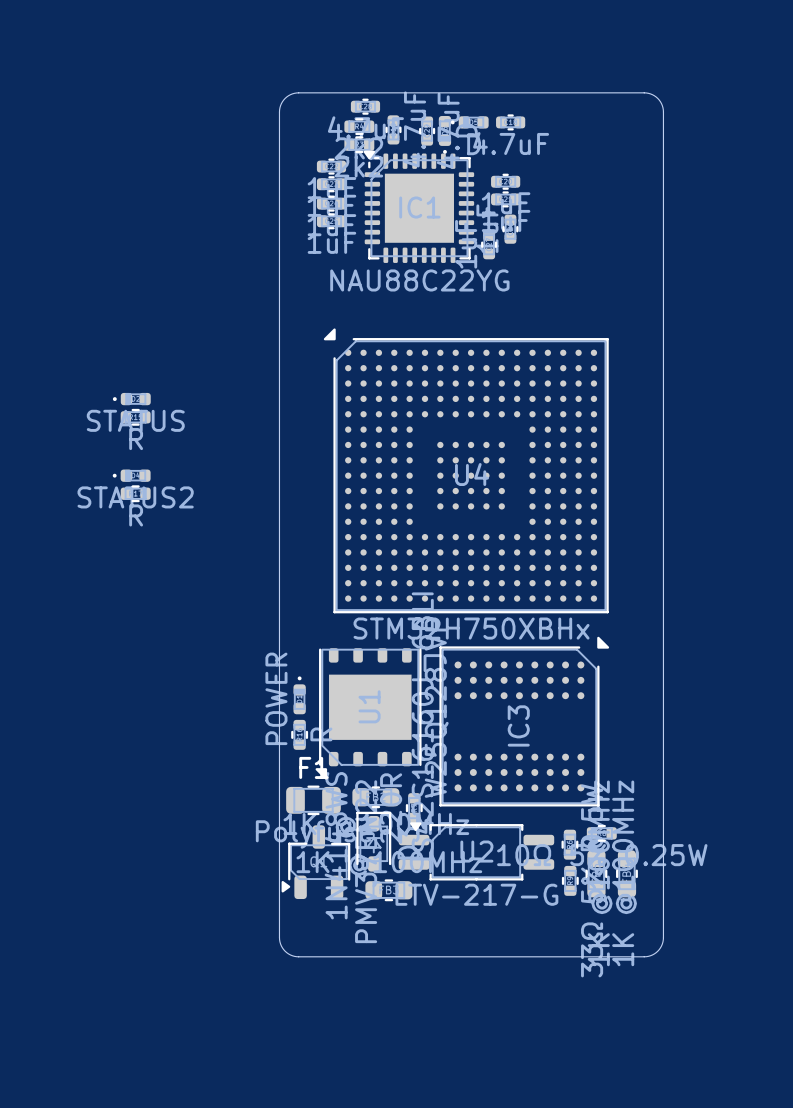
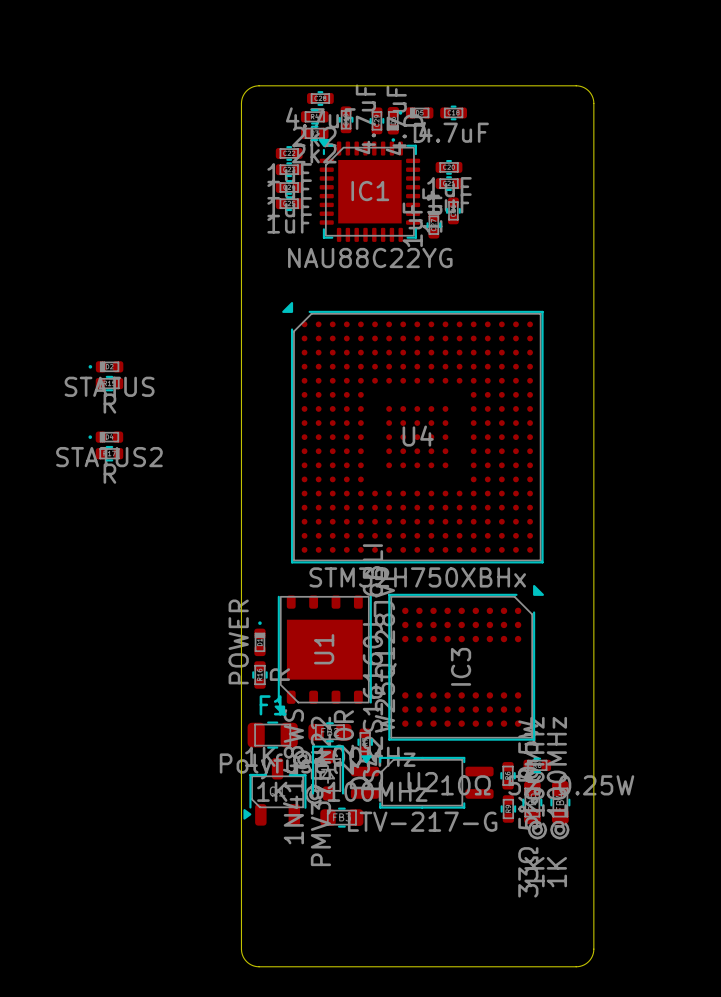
board edge: (279, 937) (285, 951) (298, 956) (644, 956) (657, 951) (663, 937) -> (241, 861) (241, 951) (248, 962) (259, 966) (582, 965) (590, 960) (593, 951) (593, 861)

